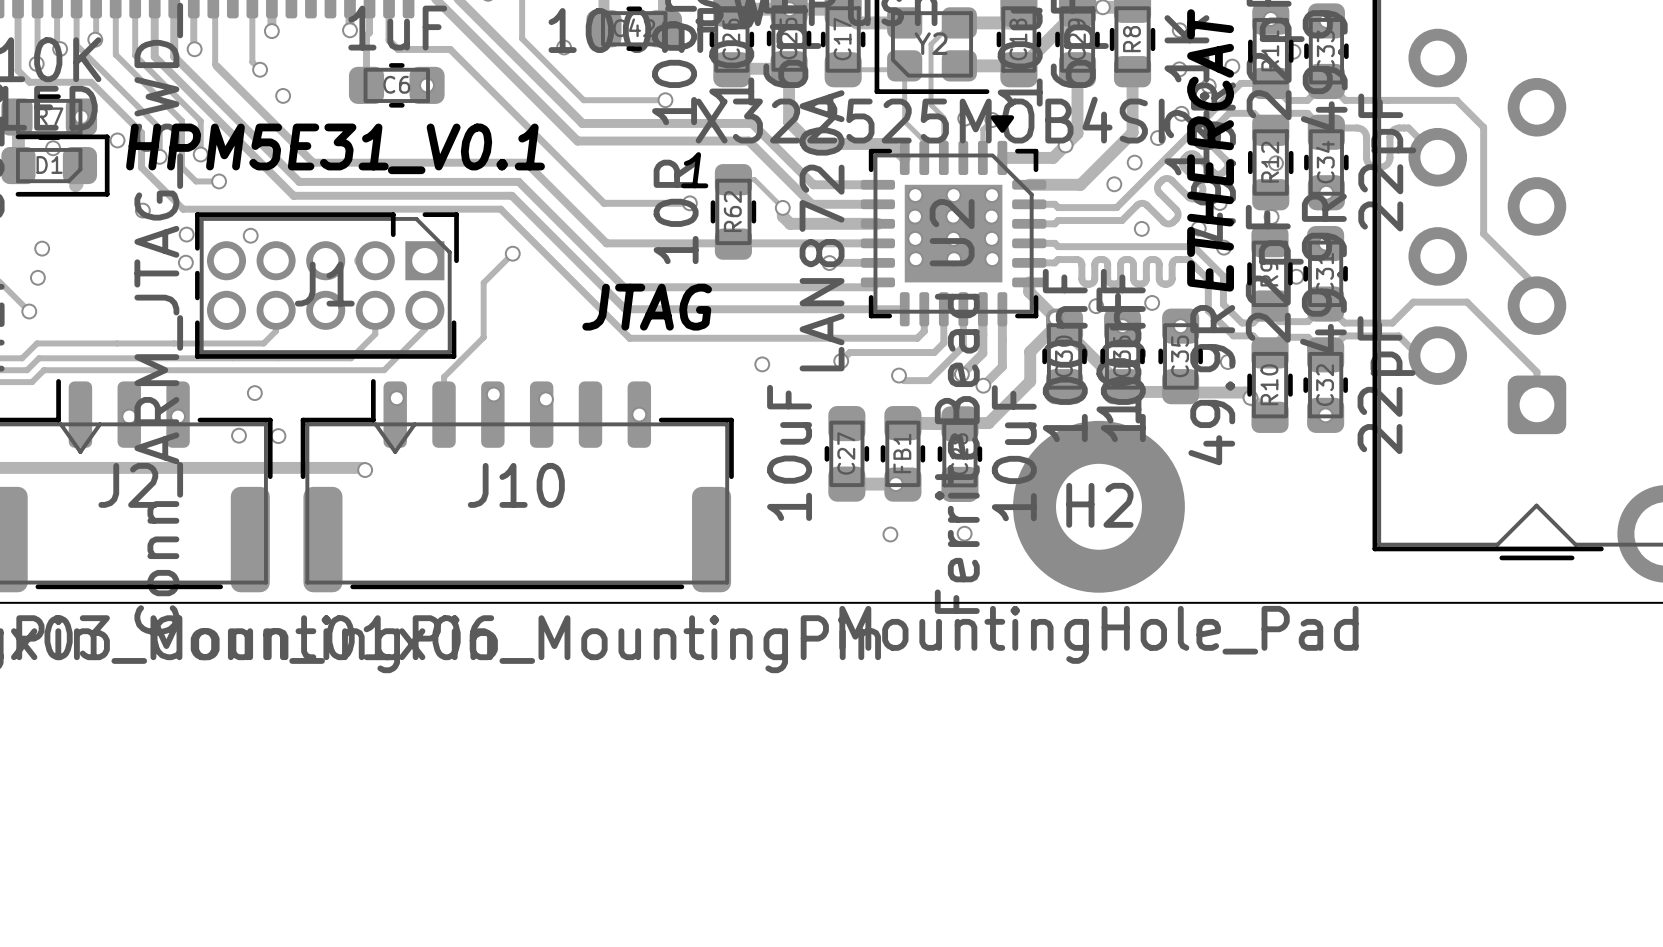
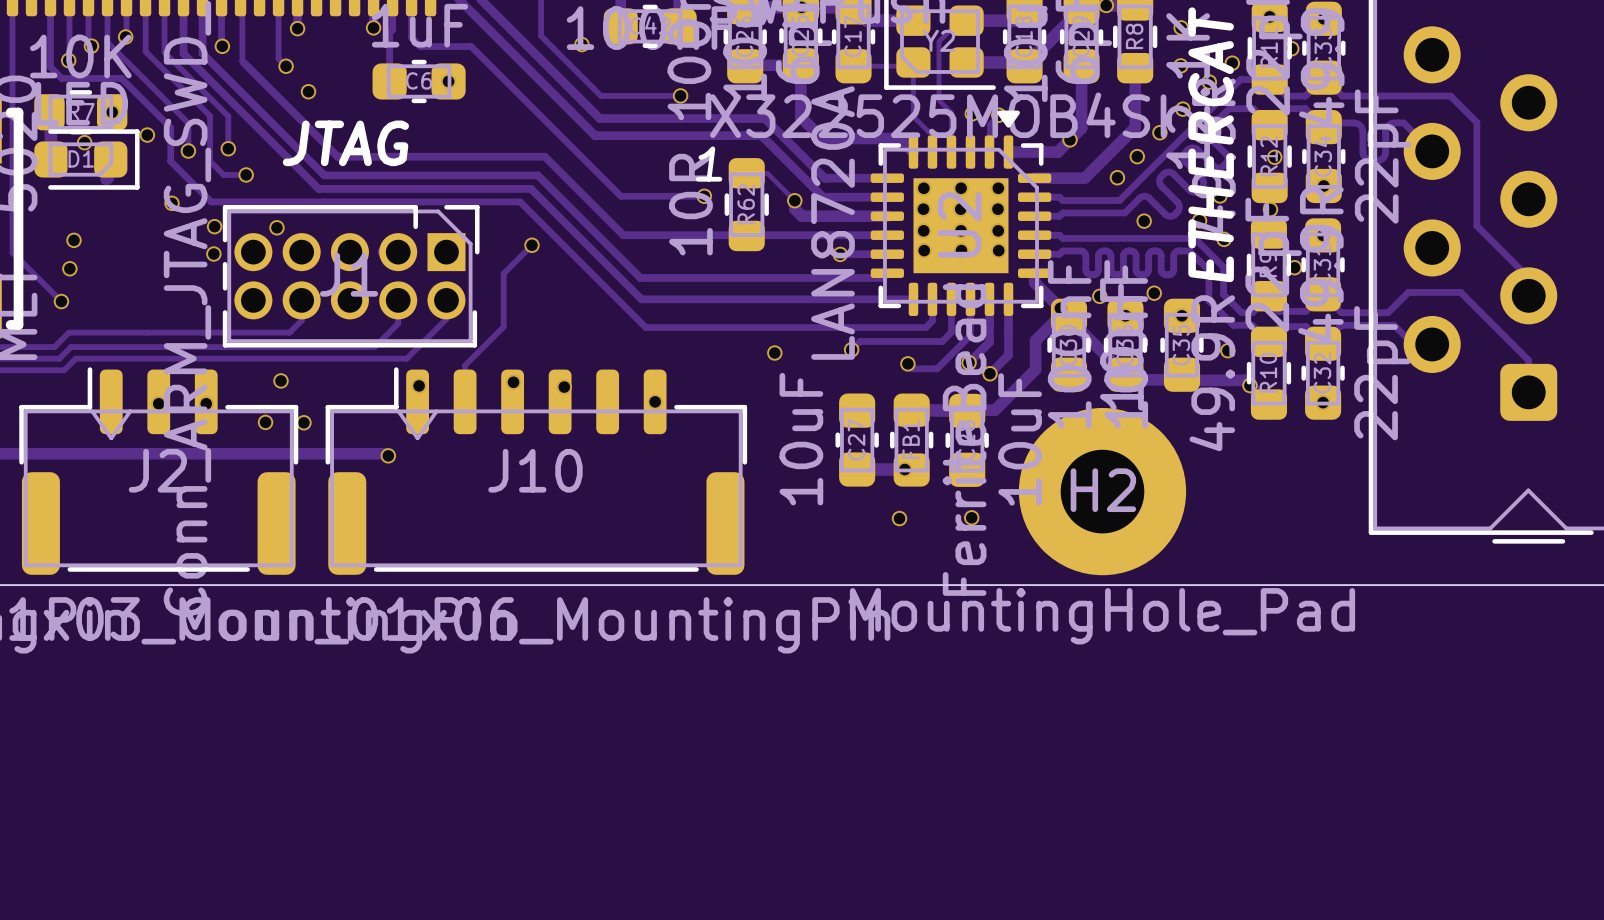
text: HPM5E31_V0.1 (335, 148) -> none
text position: JTAG (647, 307) -> JTAG (345, 143)

